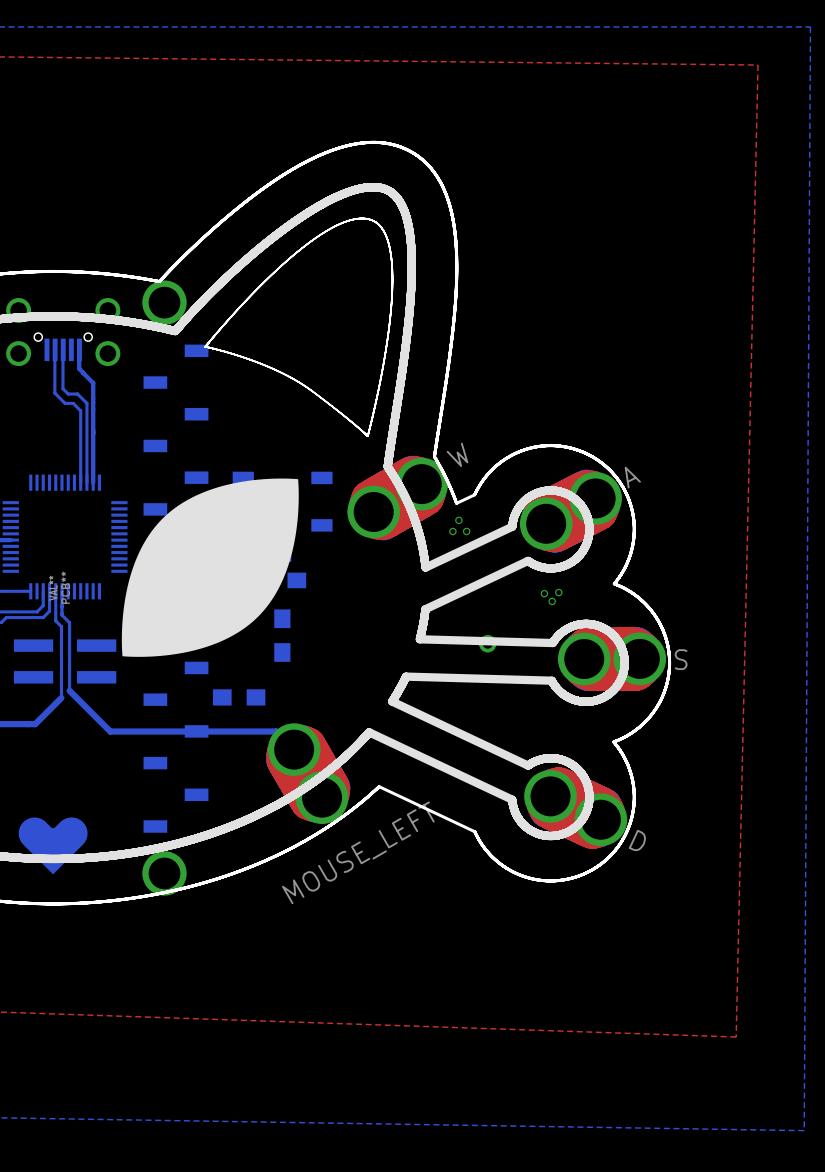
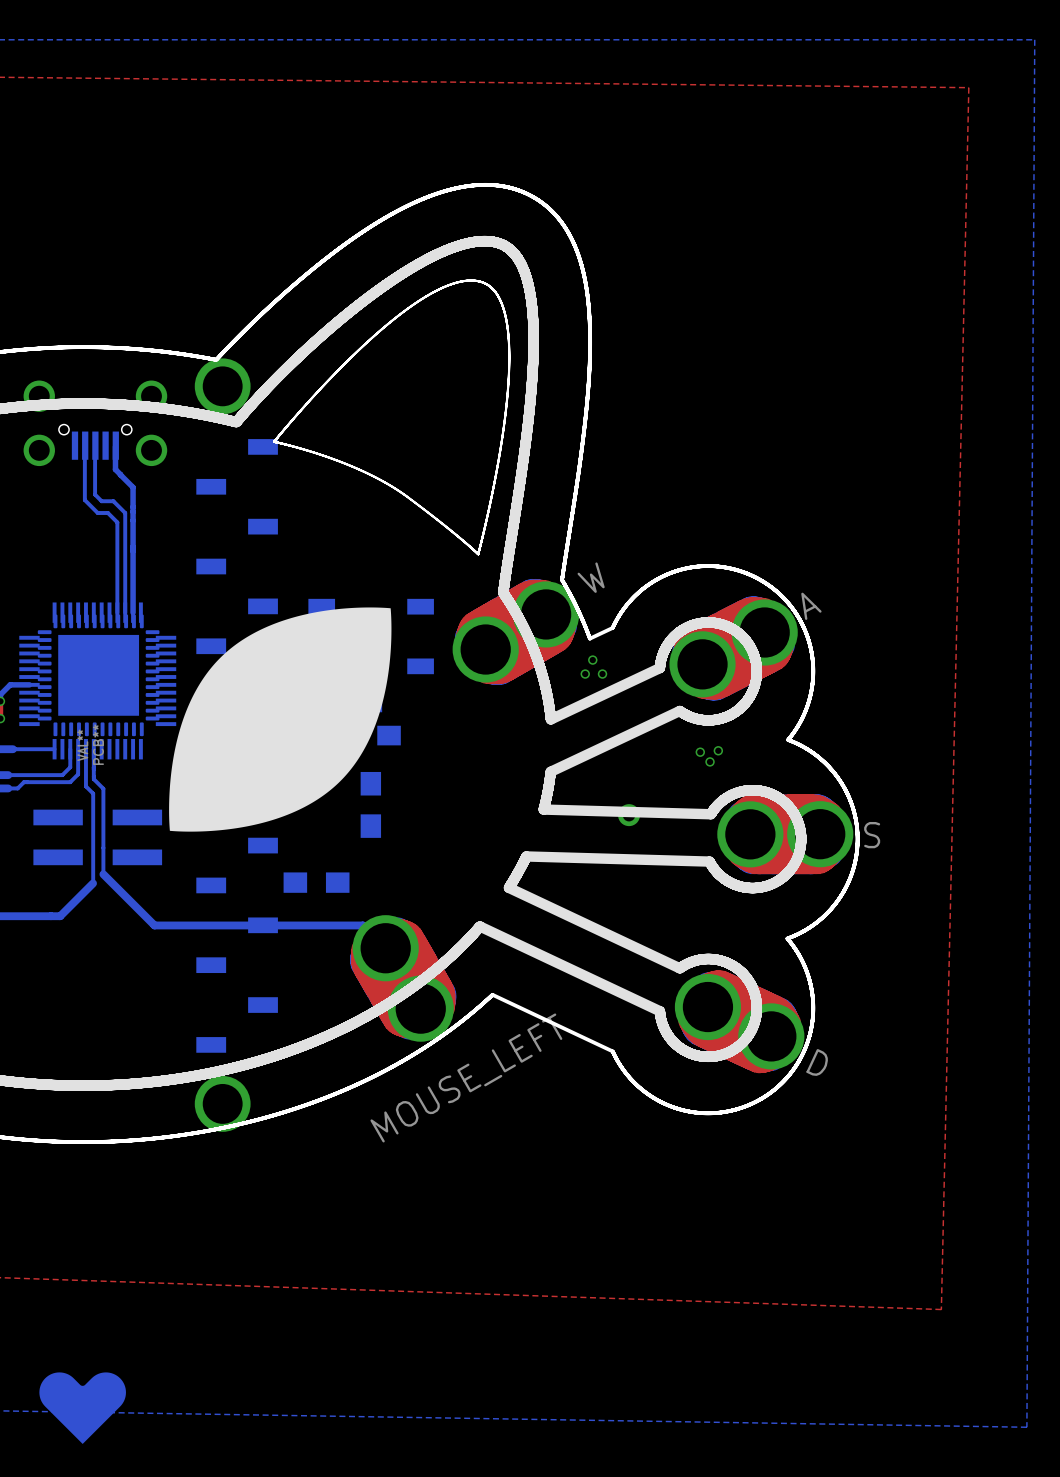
part: none -> (98, 675)
drawing position: (53, 845) -> (82, 1408)

